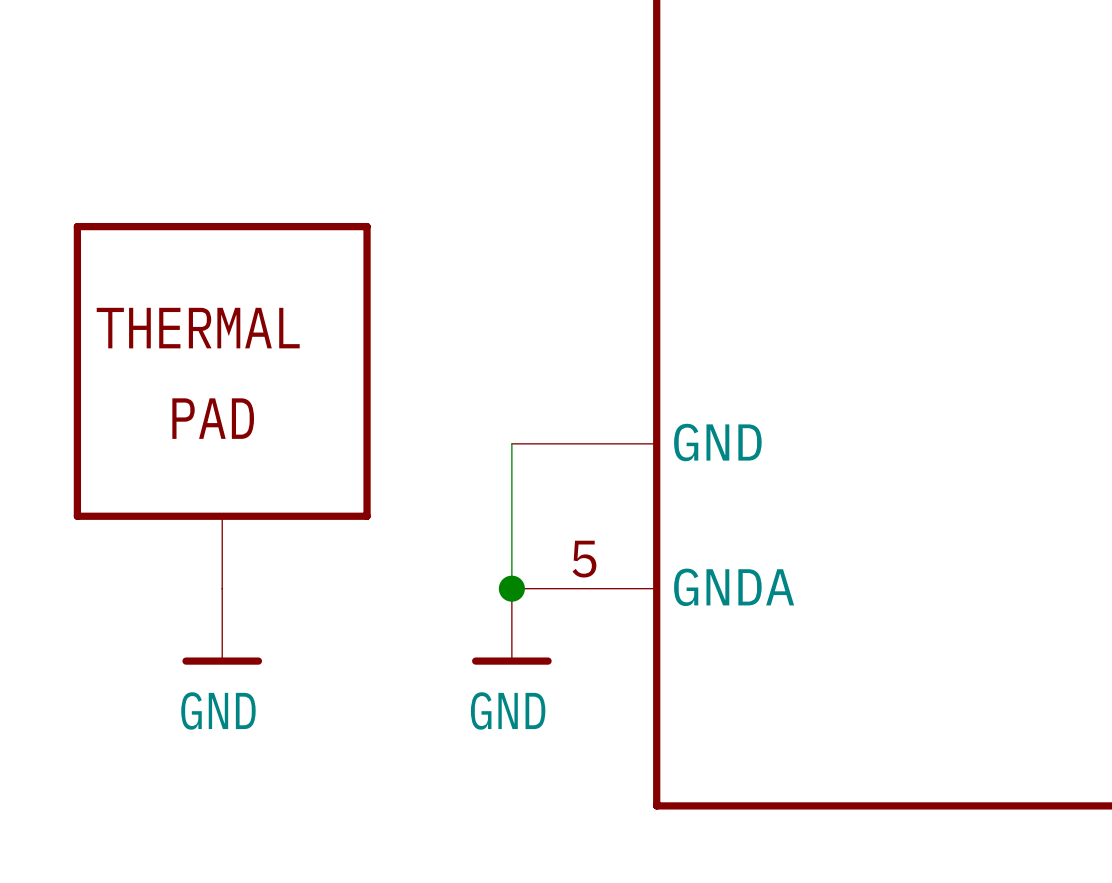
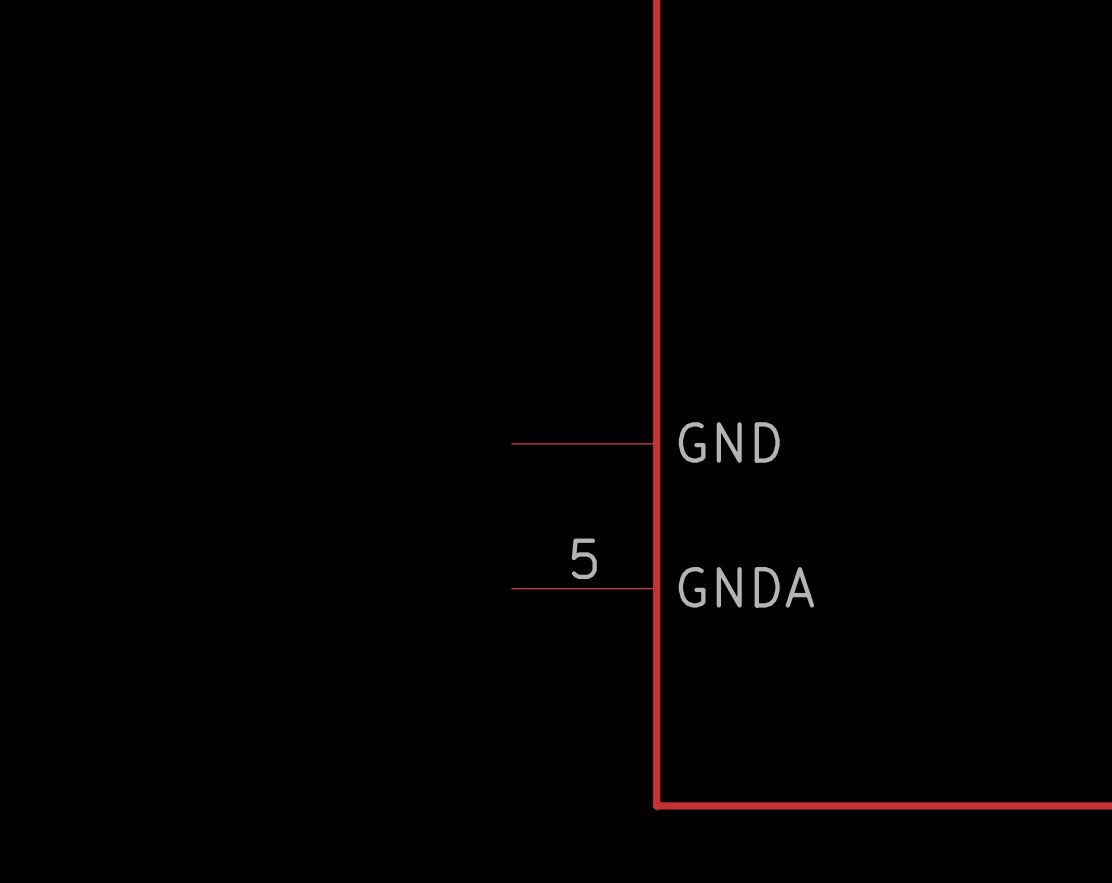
part: (222, 405) -> none
wire: (511, 443) (511, 588) -> none
junction: (511, 588) -> none
power symbol: GND (222, 626) -> none
power symbol: GND (511, 626) -> none

